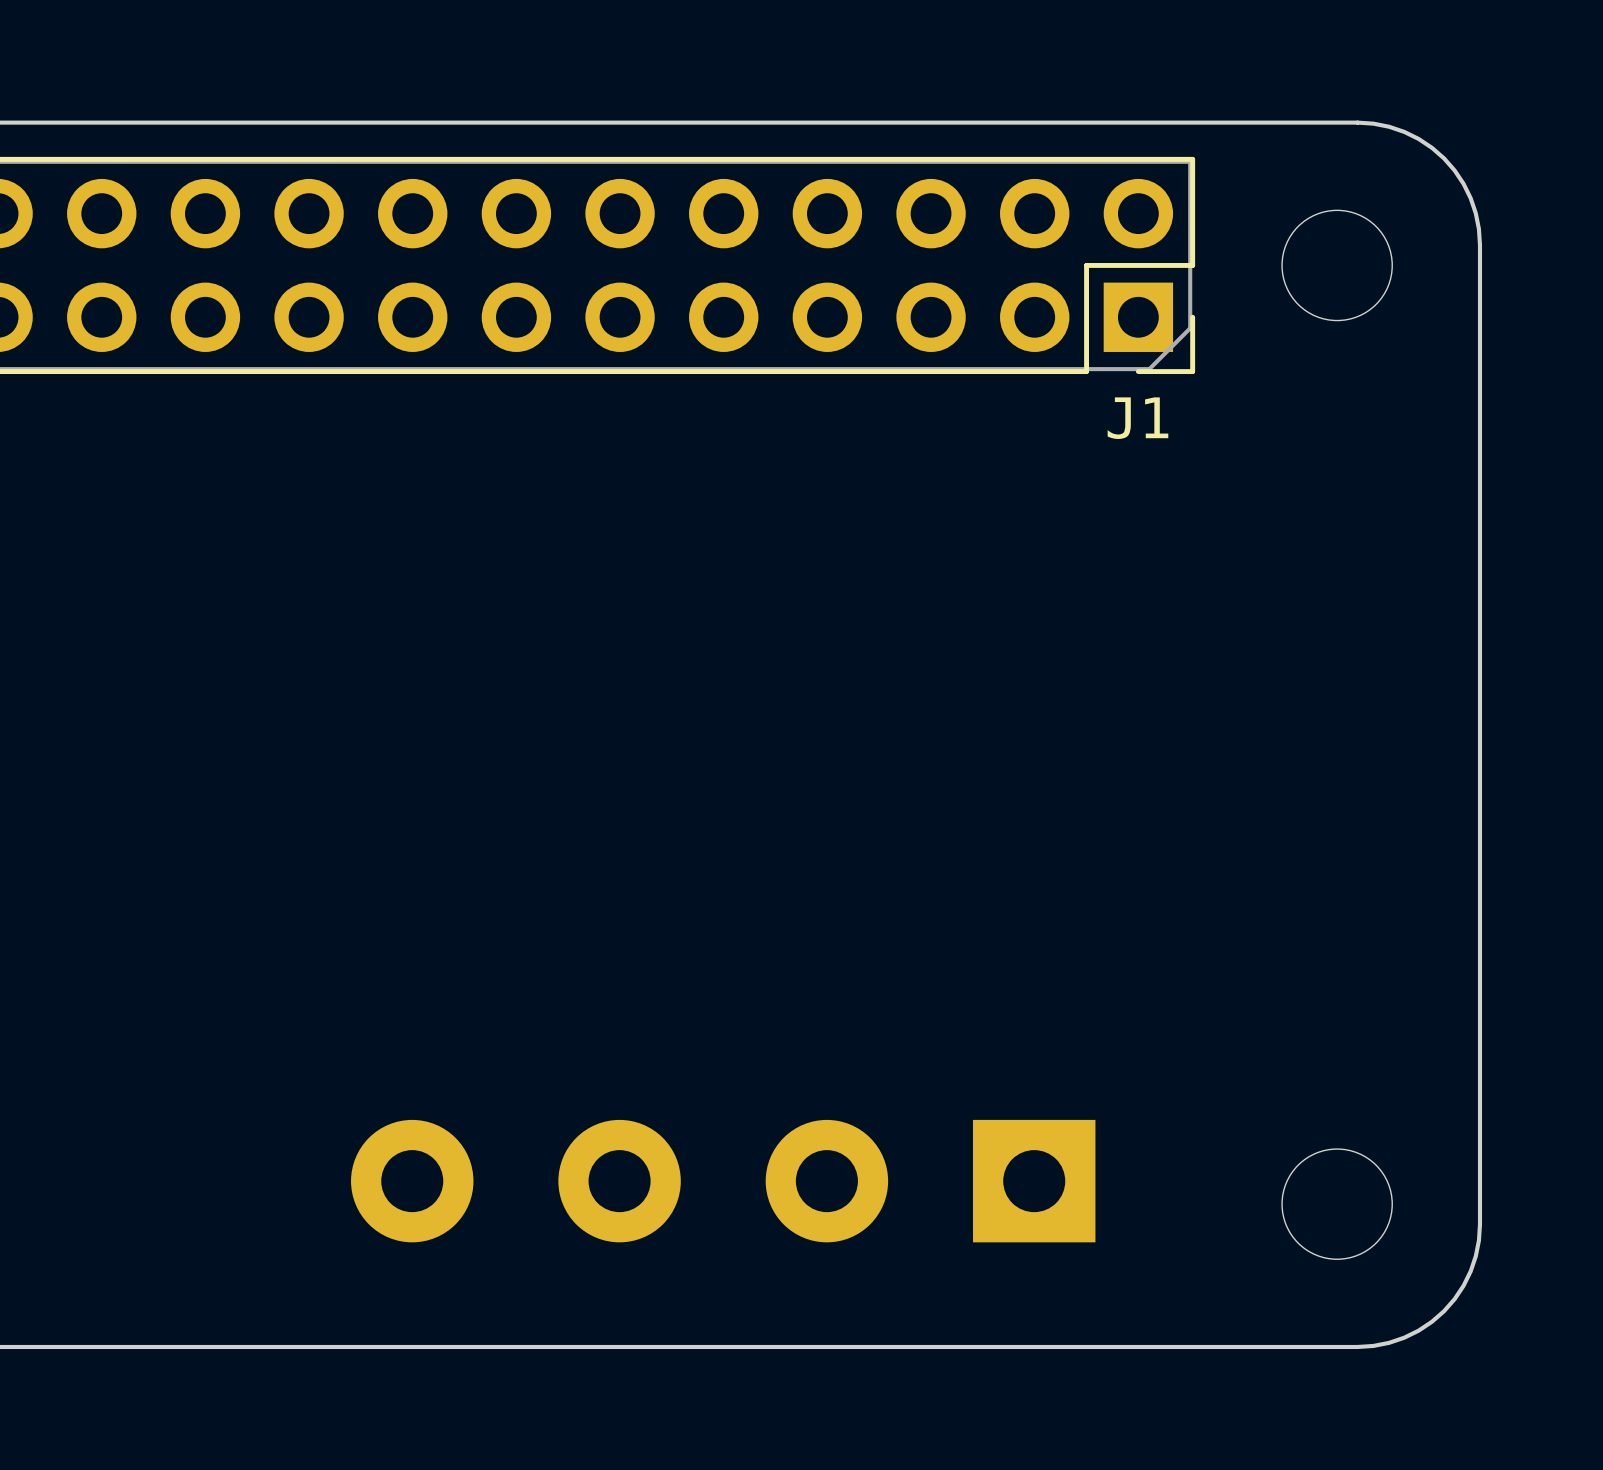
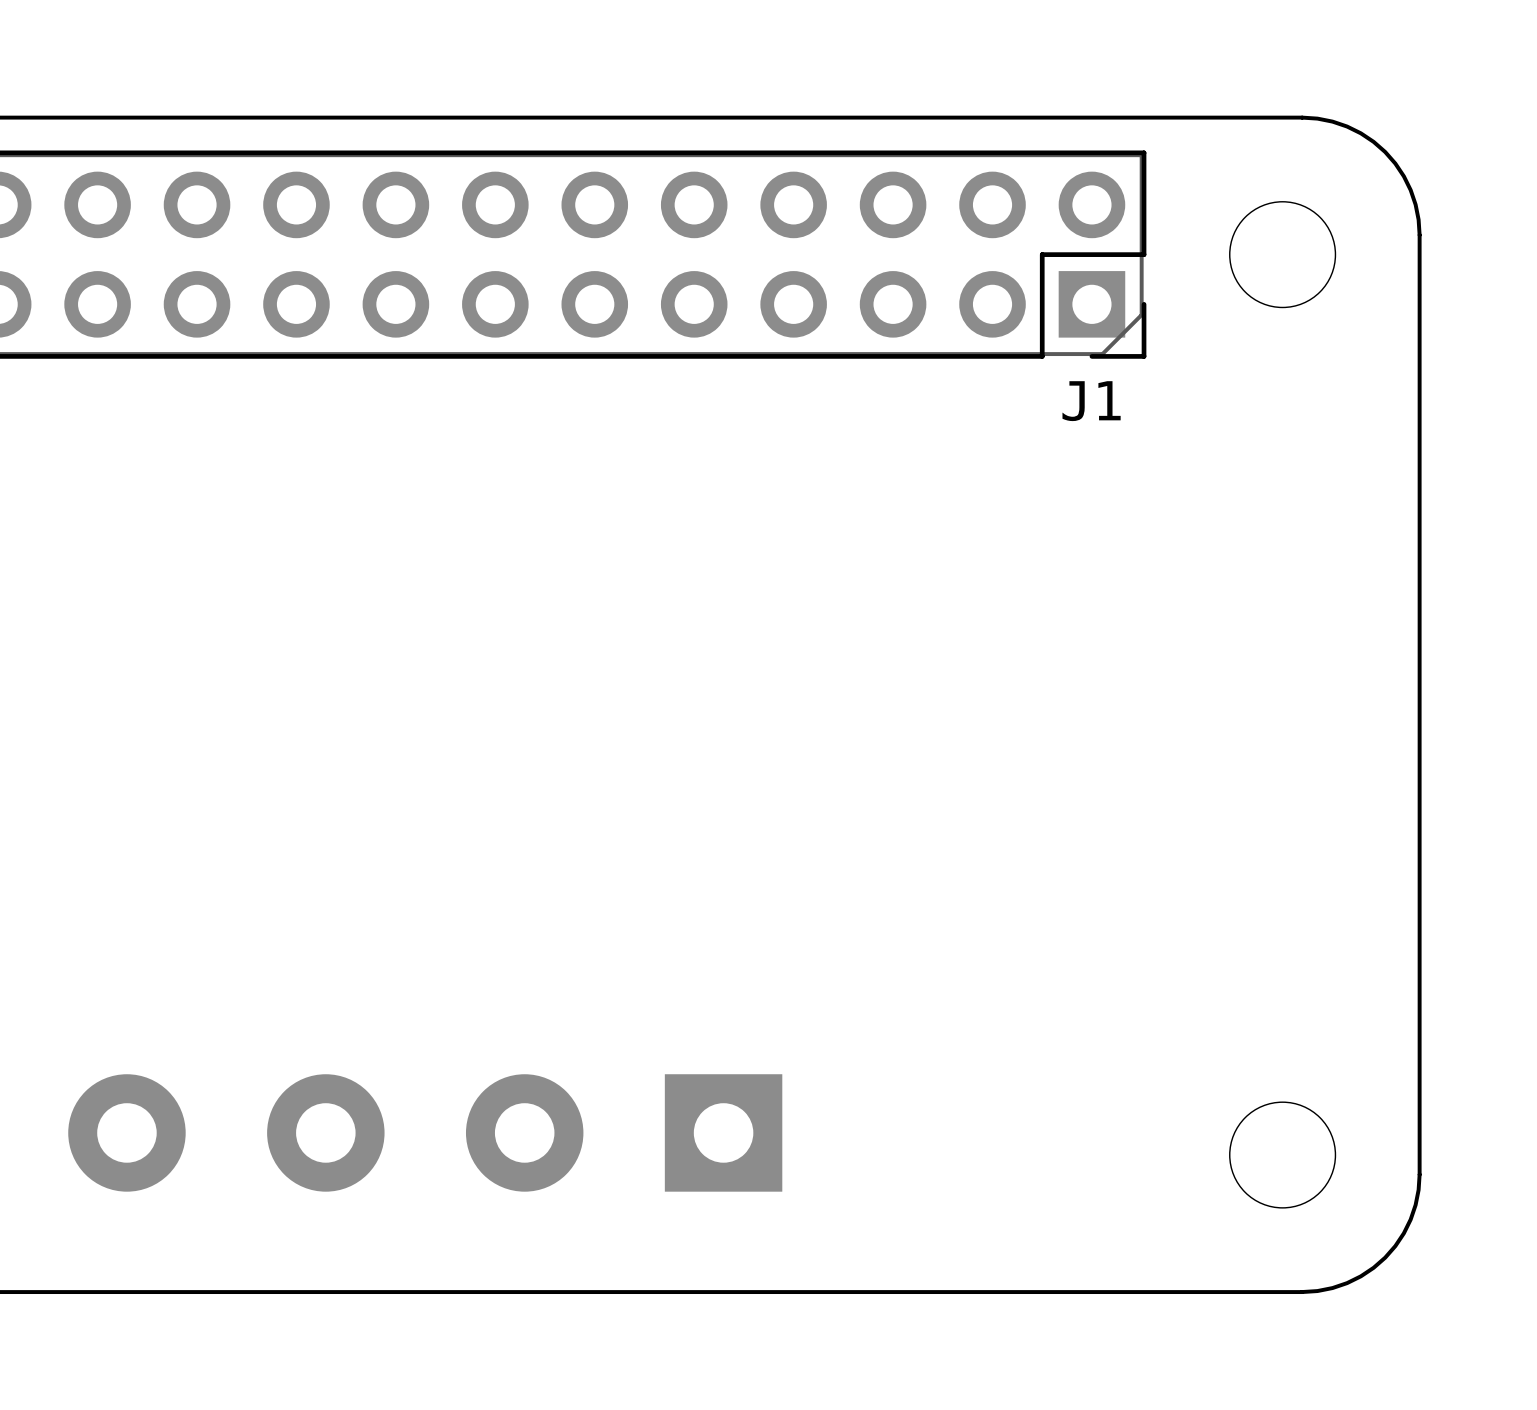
part position: (723, 1181) -> (425, 1132)

